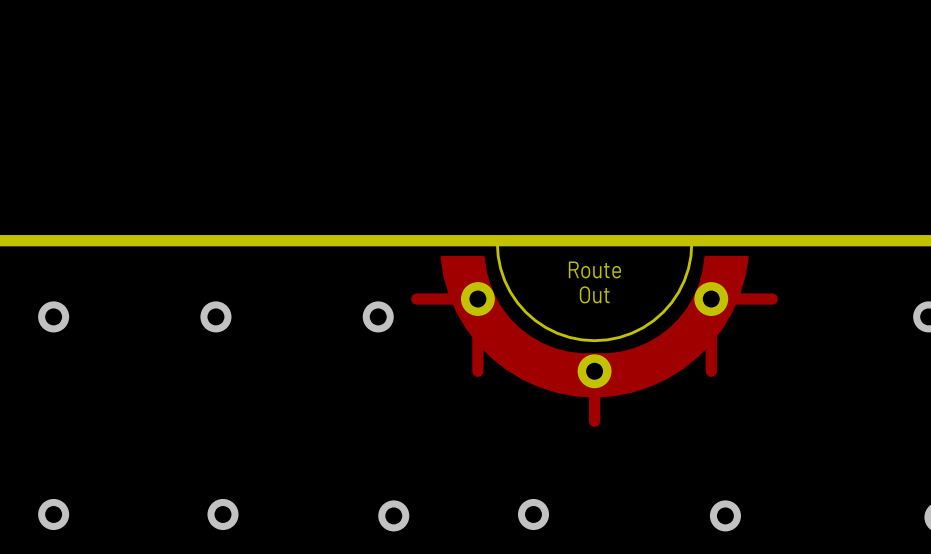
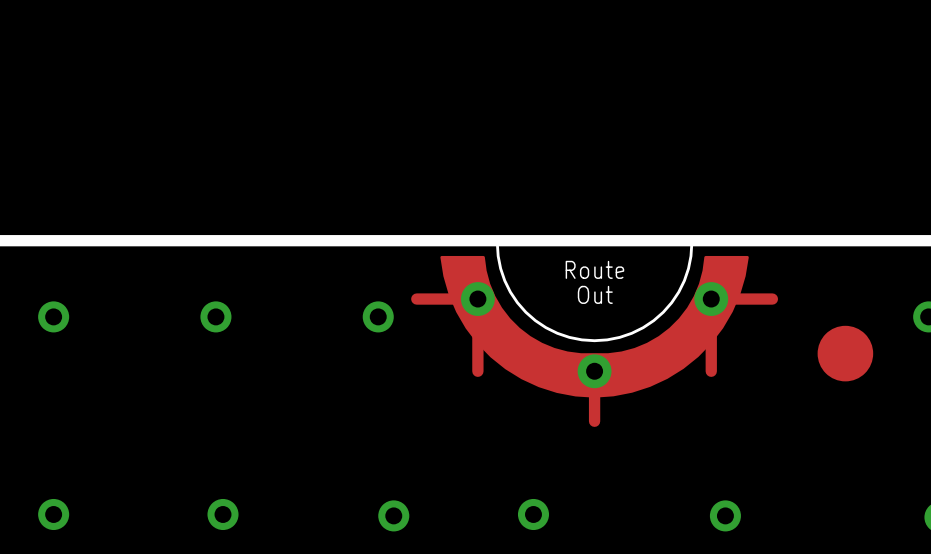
part: none -> (845, 353)

